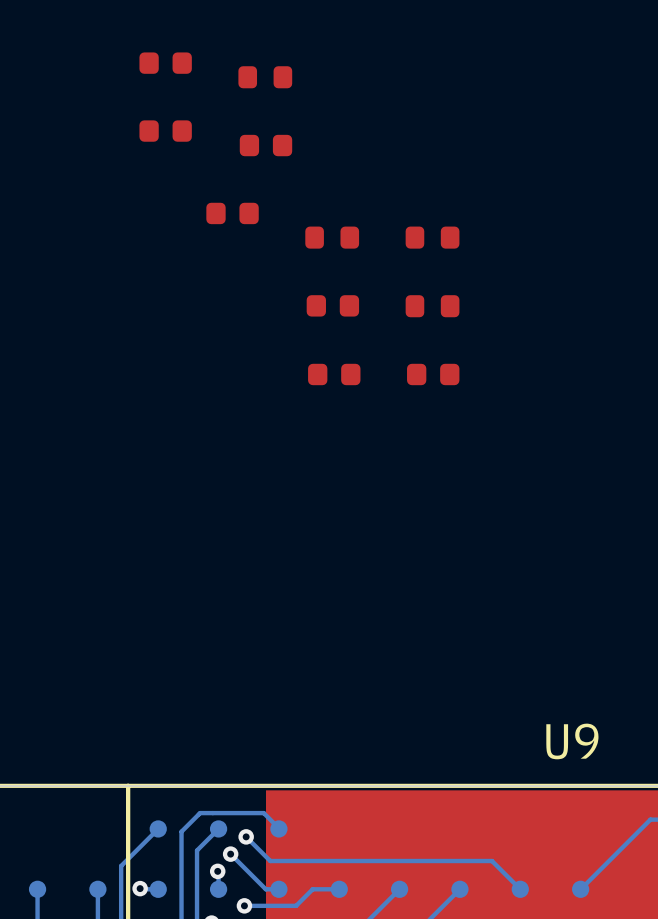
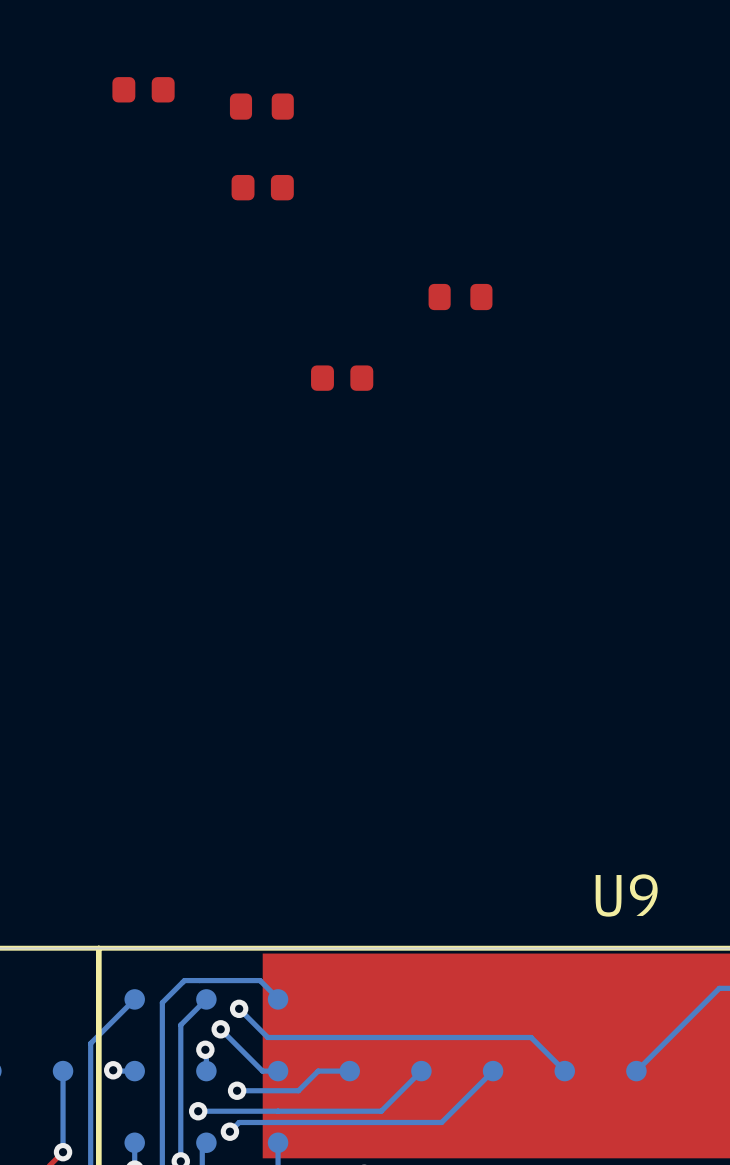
part: (165, 131) -> none
part: (232, 213) -> none
part: (332, 237) -> none
part: (432, 306) -> none
part: (334, 374) -> none
part: (433, 374) -> none

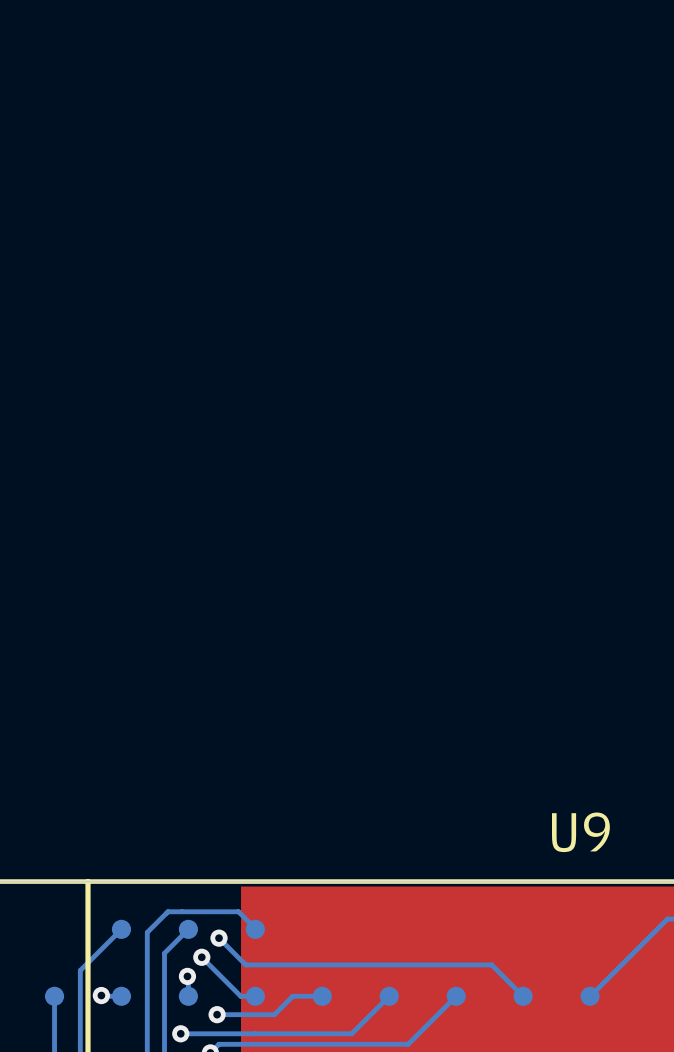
part: (143, 89) -> none
part: (261, 106) -> none
part: (262, 187) -> none
part: (460, 297) -> none
part: (342, 378) -> none

